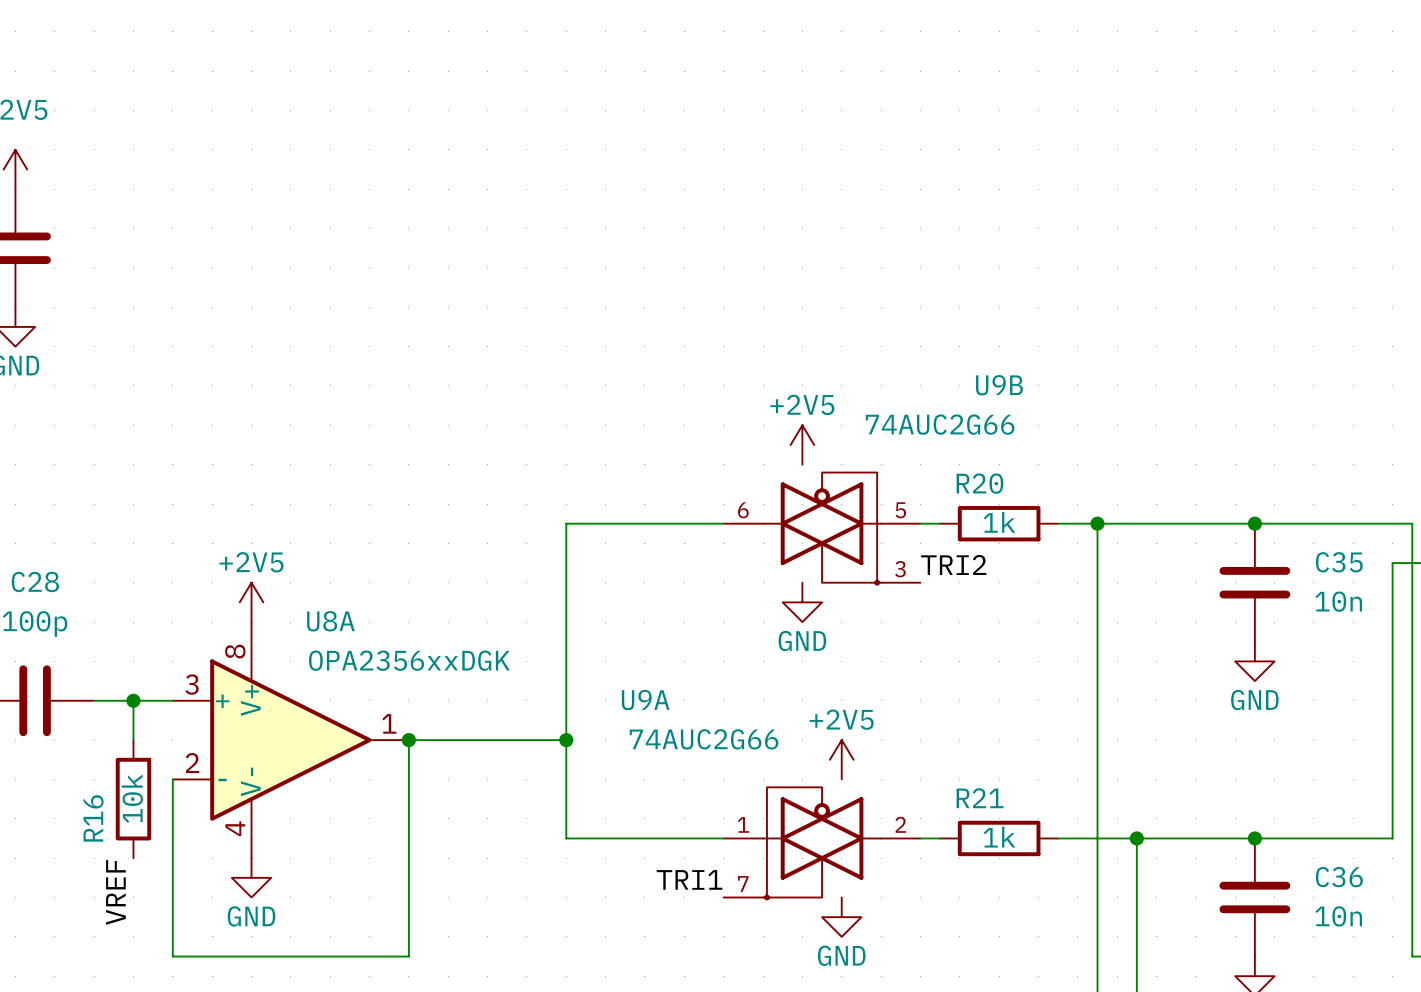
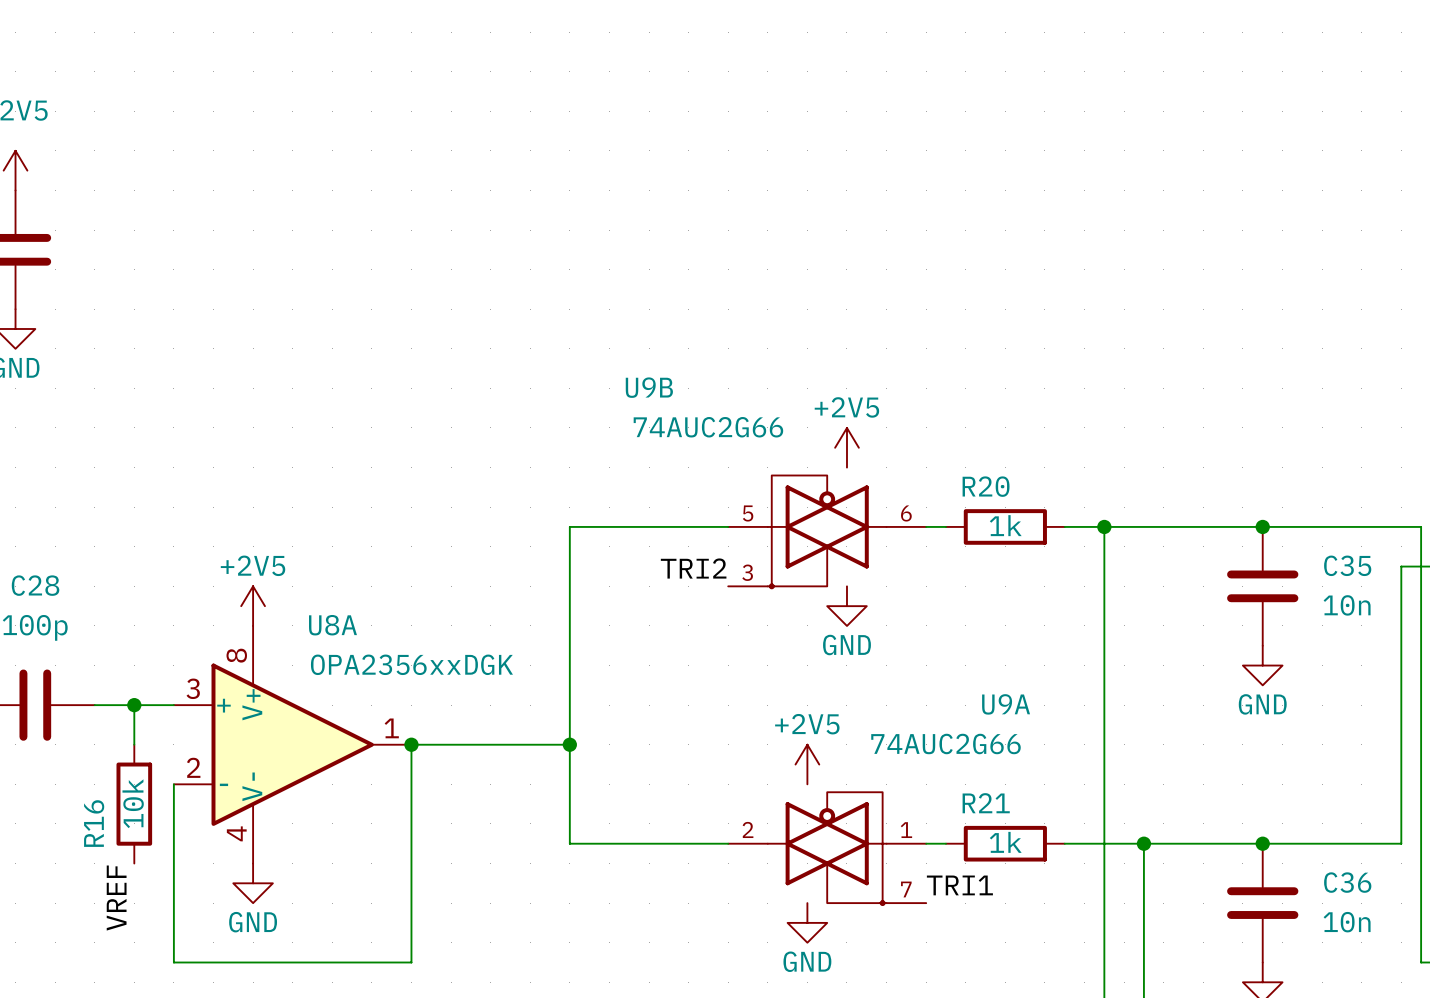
power symbol position: +2V5 (802, 444) -> +2V5 (846, 447)
U9B flip: as is (822, 528) -> left-right (827, 531)
label position: TRI2 (953, 564) -> TRI2 (693, 568)
power symbol position: GND (802, 602) -> GND (846, 606)
power symbol position: +2V5 (841, 759) -> +2V5 (807, 764)
U9A flip: as is (822, 843) -> left-right (827, 848)
label position: TRI1 (689, 879) -> TRI1 (959, 885)
power symbol position: GND (841, 917) -> GND (807, 922)

